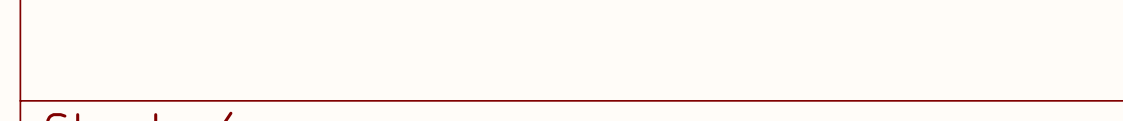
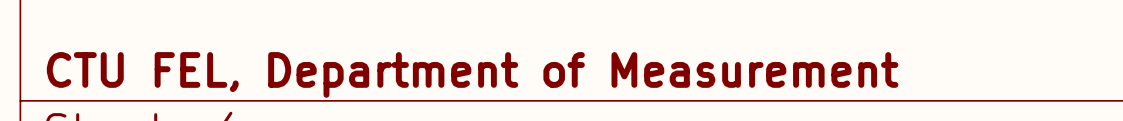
title block: none -> CTU FEL, Department of Measurement (472, 74)

